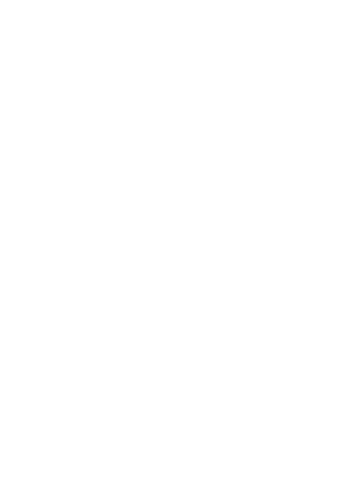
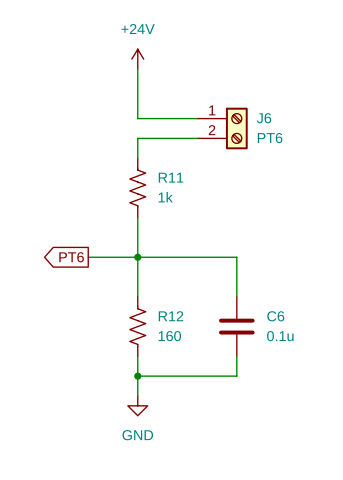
power symbol: none -> +24V (137, 59)
wire: none -> (137, 69) (137, 118) (197, 118)
J6: none -> PT6 (222, 128)
wire: none -> (197, 138) (137, 138) (137, 158)
R11: none -> 1k (137, 187)
wire: none -> (137, 217) (137, 296)
global label: none -> PT6 (71, 257)
wire: none -> (88, 257) (236, 257) (236, 296)
junction: none -> (137, 257)
R12: none -> 160 (137, 326)
C6: none -> 0.1u (236, 326)
wire: none -> (137, 356) (137, 395)
wire: none -> (236, 356) (236, 376) (137, 376)
junction: none -> (137, 376)
power symbol: none -> GND (137, 405)

